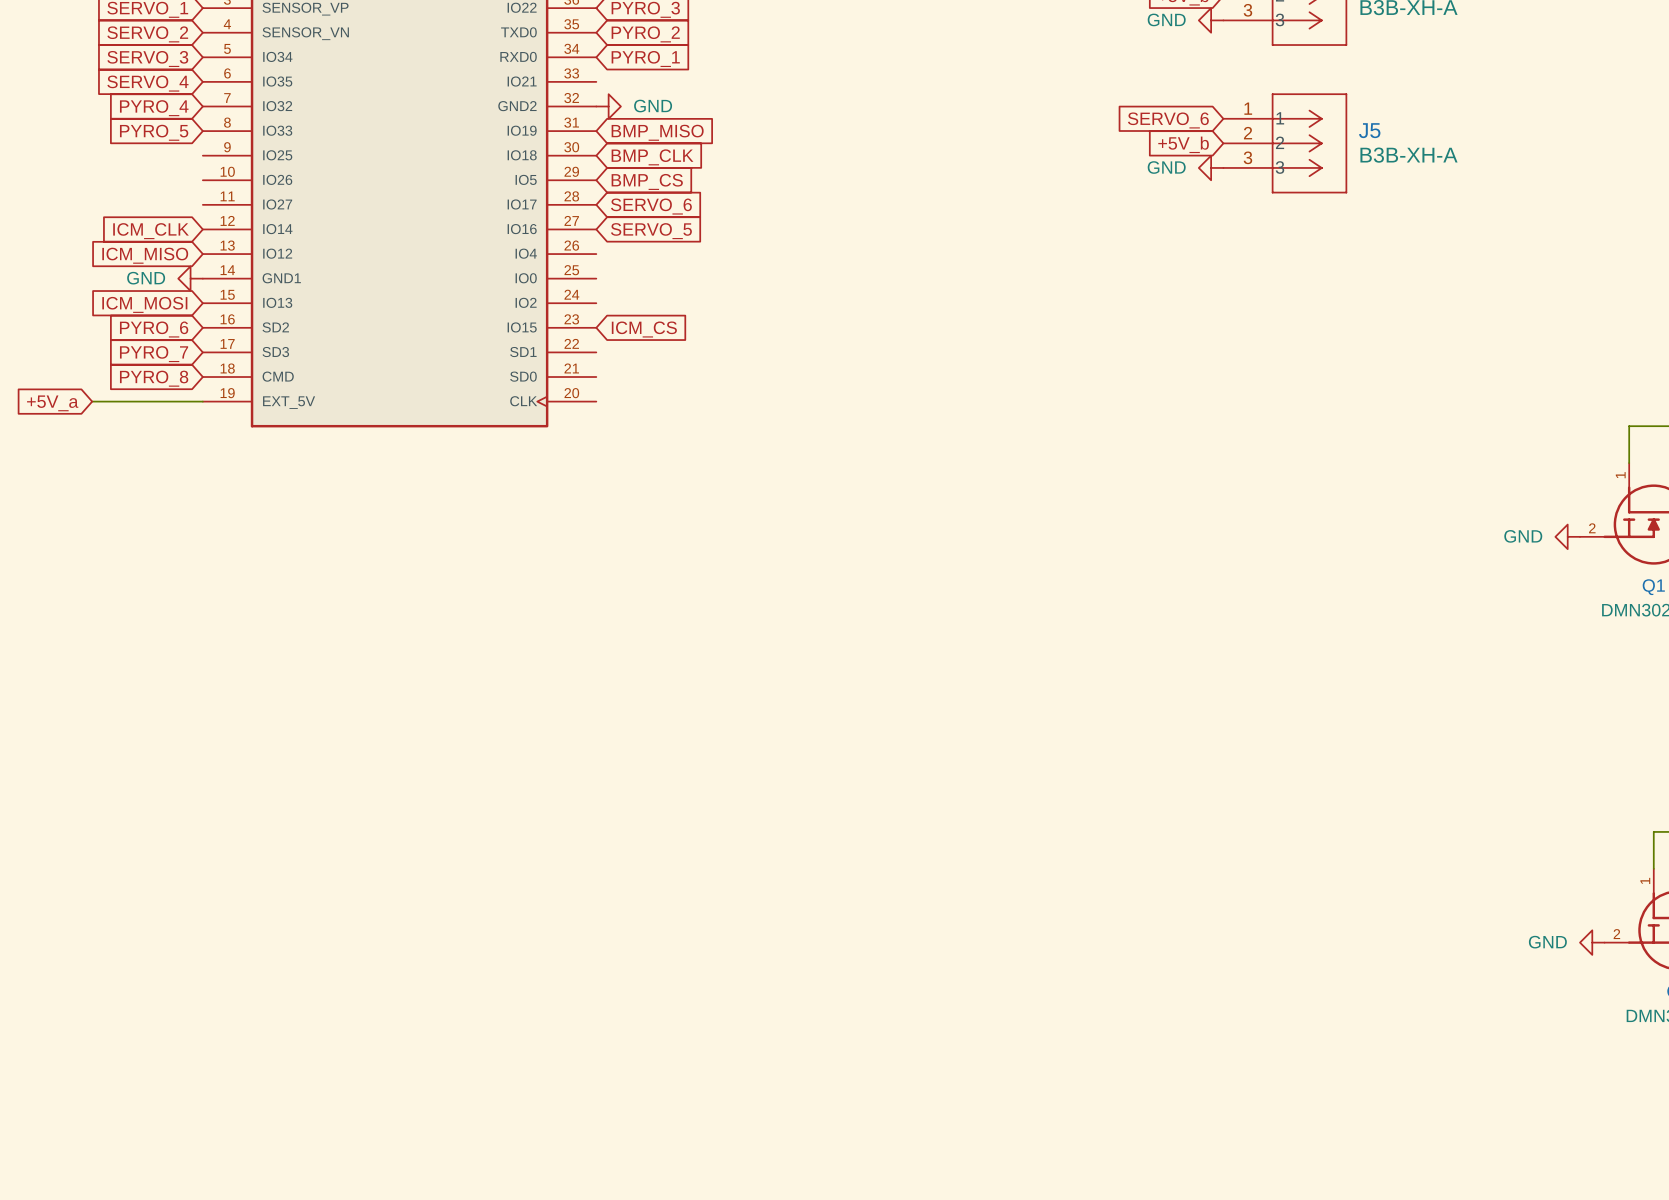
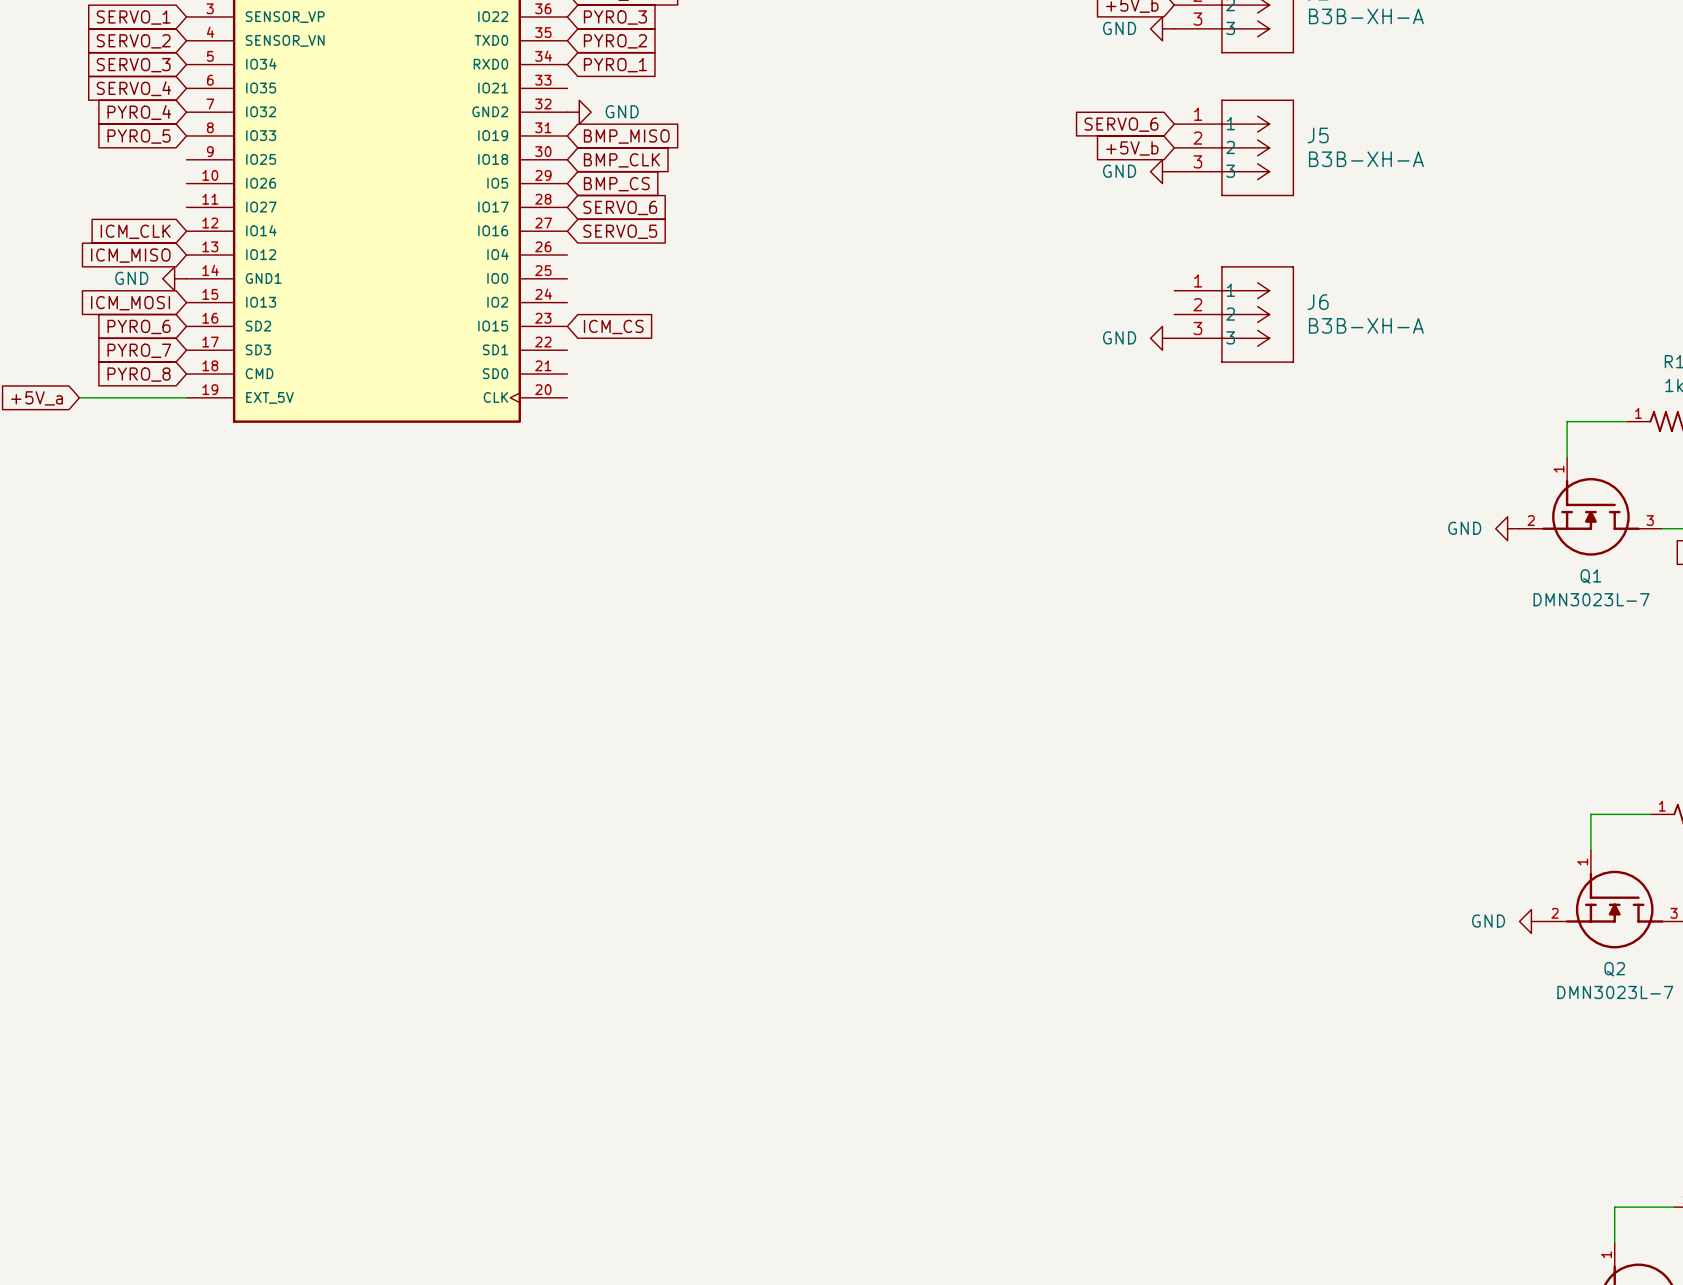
J6: none -> B3B-XH-A (1234, 314)
power symbol: none -> GND (1162, 338)

